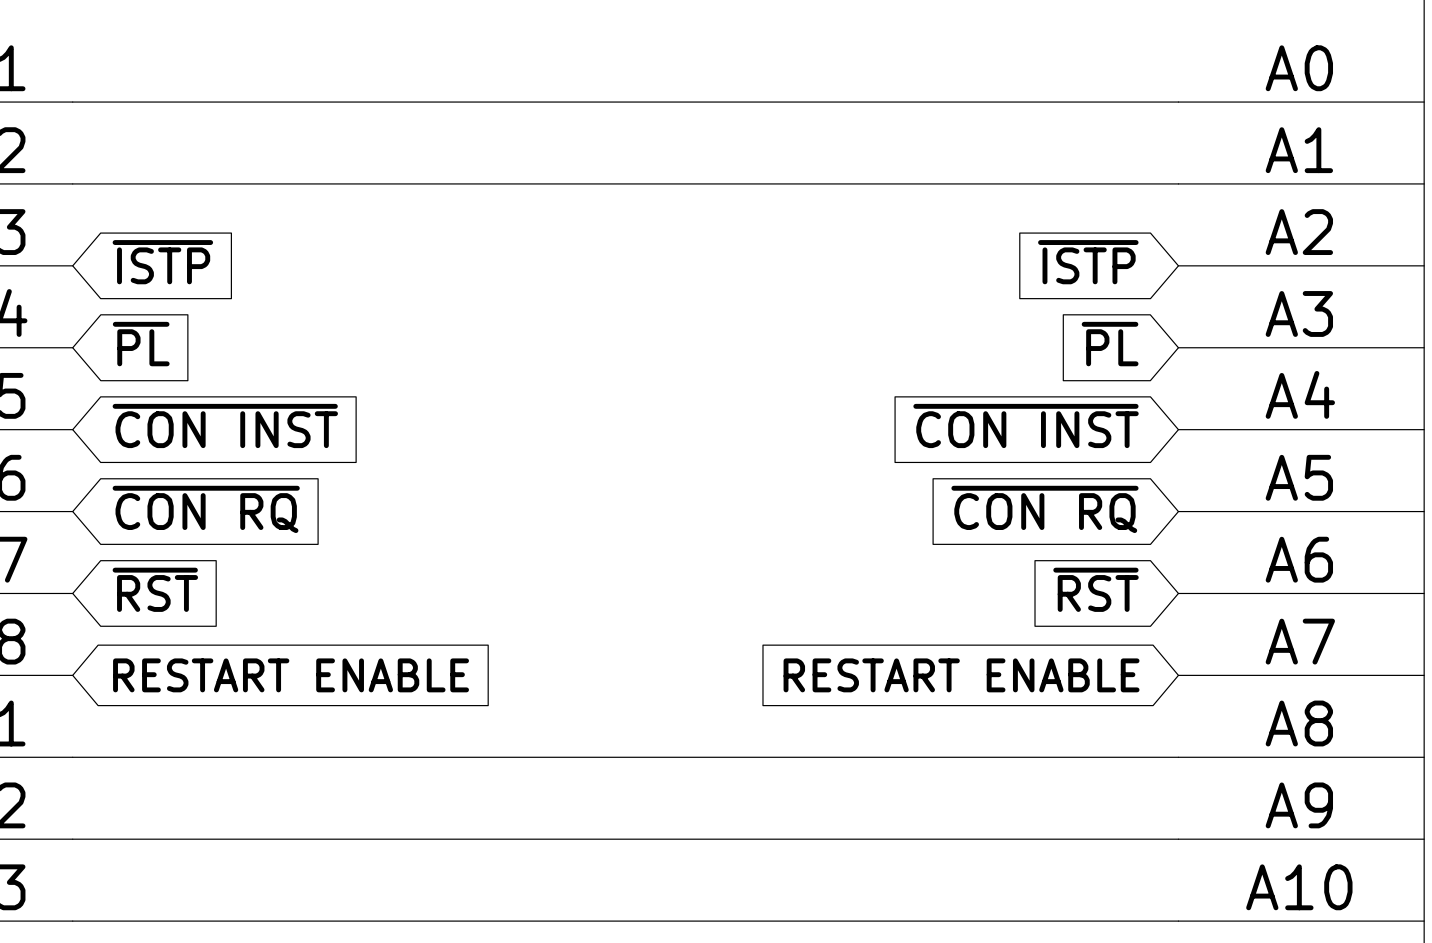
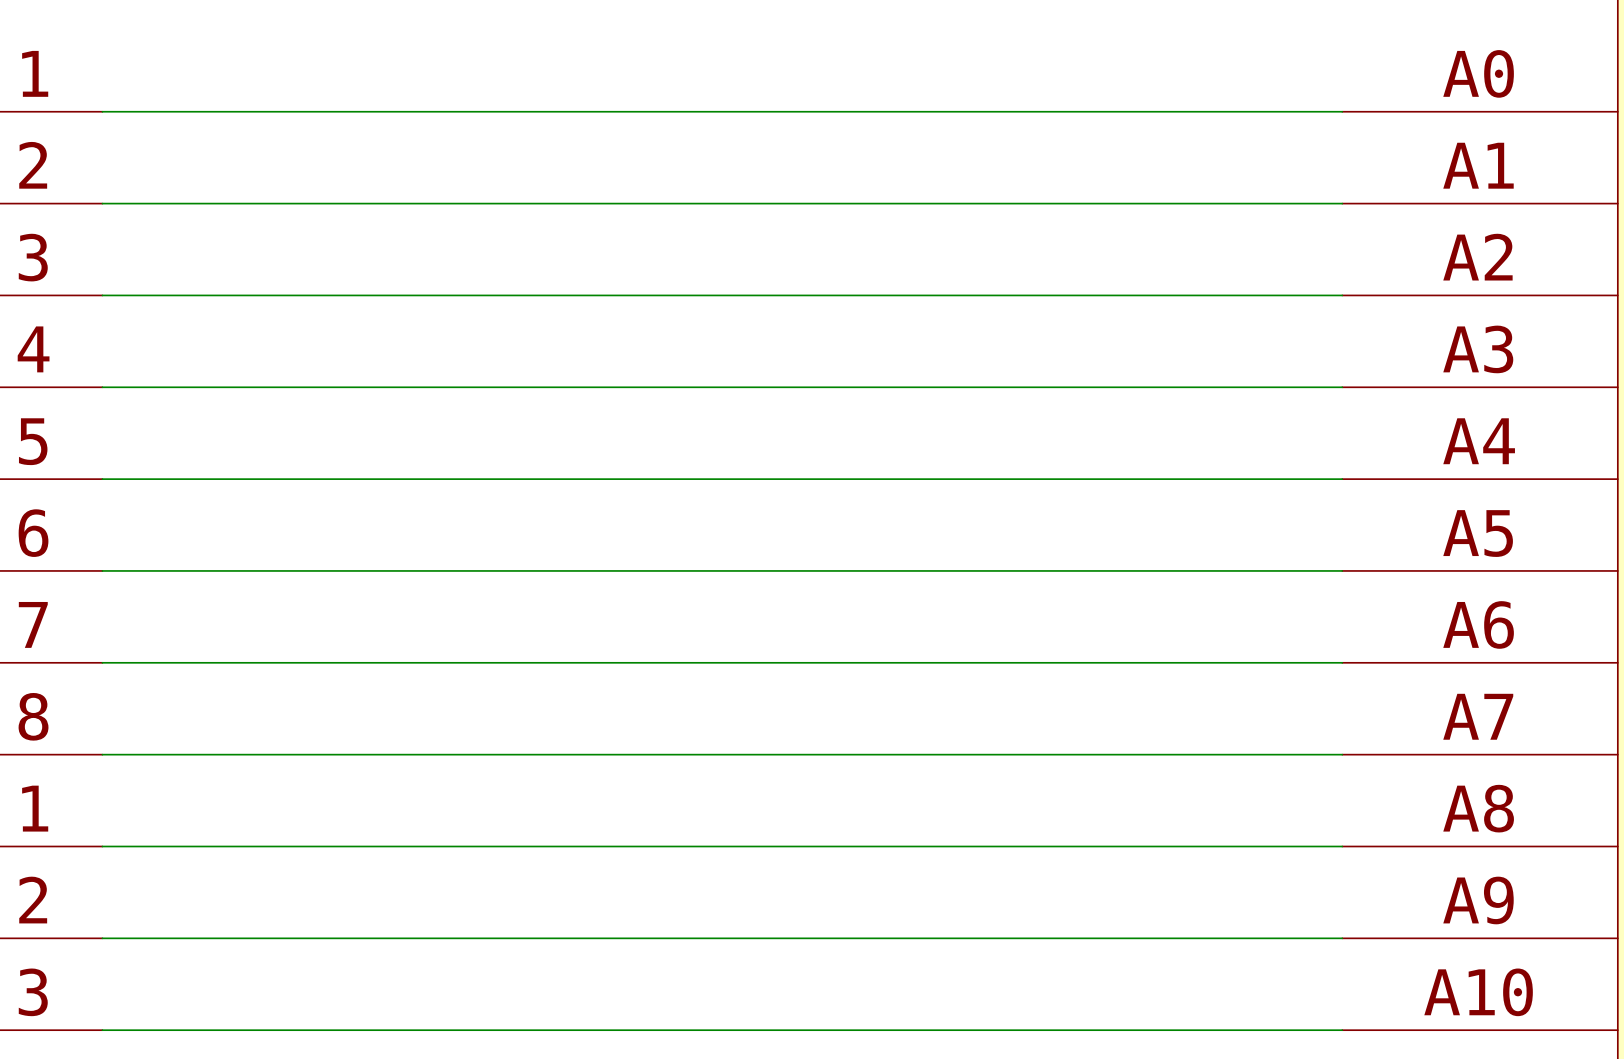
global label: ~{ISTP} (162, 262) -> none
global label: ~{ISTP} (1088, 262) -> none
wire: none -> (102, 295) (1342, 295)
global label: ~{PL} (141, 344) -> none
global label: ~{PL} (1110, 344) -> none
wire: none -> (102, 387) (1342, 387)
global label: ~{CON INST} (225, 425) -> none
global label: ~{CON INST} (1026, 425) -> none
wire: none -> (102, 479) (1342, 479)
global label: ~{CON RQ} (206, 509) -> none
global label: ~{CON RQ} (1044, 509) -> none
wire: none -> (102, 570) (1342, 570)
global label: ~{RST} (155, 589) -> none
global label: ~{RST} (1096, 589) -> none
wire: none -> (102, 662) (1342, 662)
wire: none -> (102, 754) (1342, 754)
global label: RESTART ENABLE (291, 675) -> none
global label: RESTART ENABLE (961, 675) -> none

